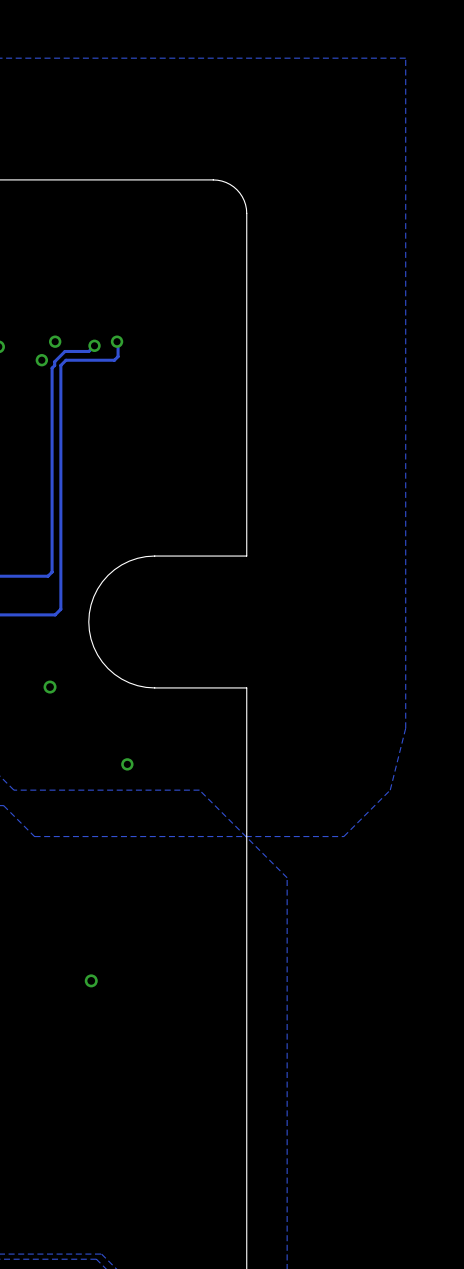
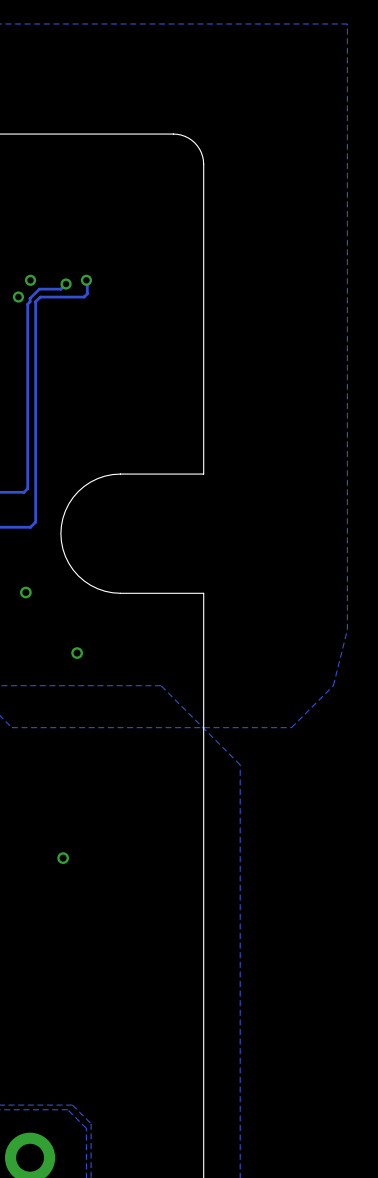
via: none -> (77, 653)
via: (127, 764) -> none

